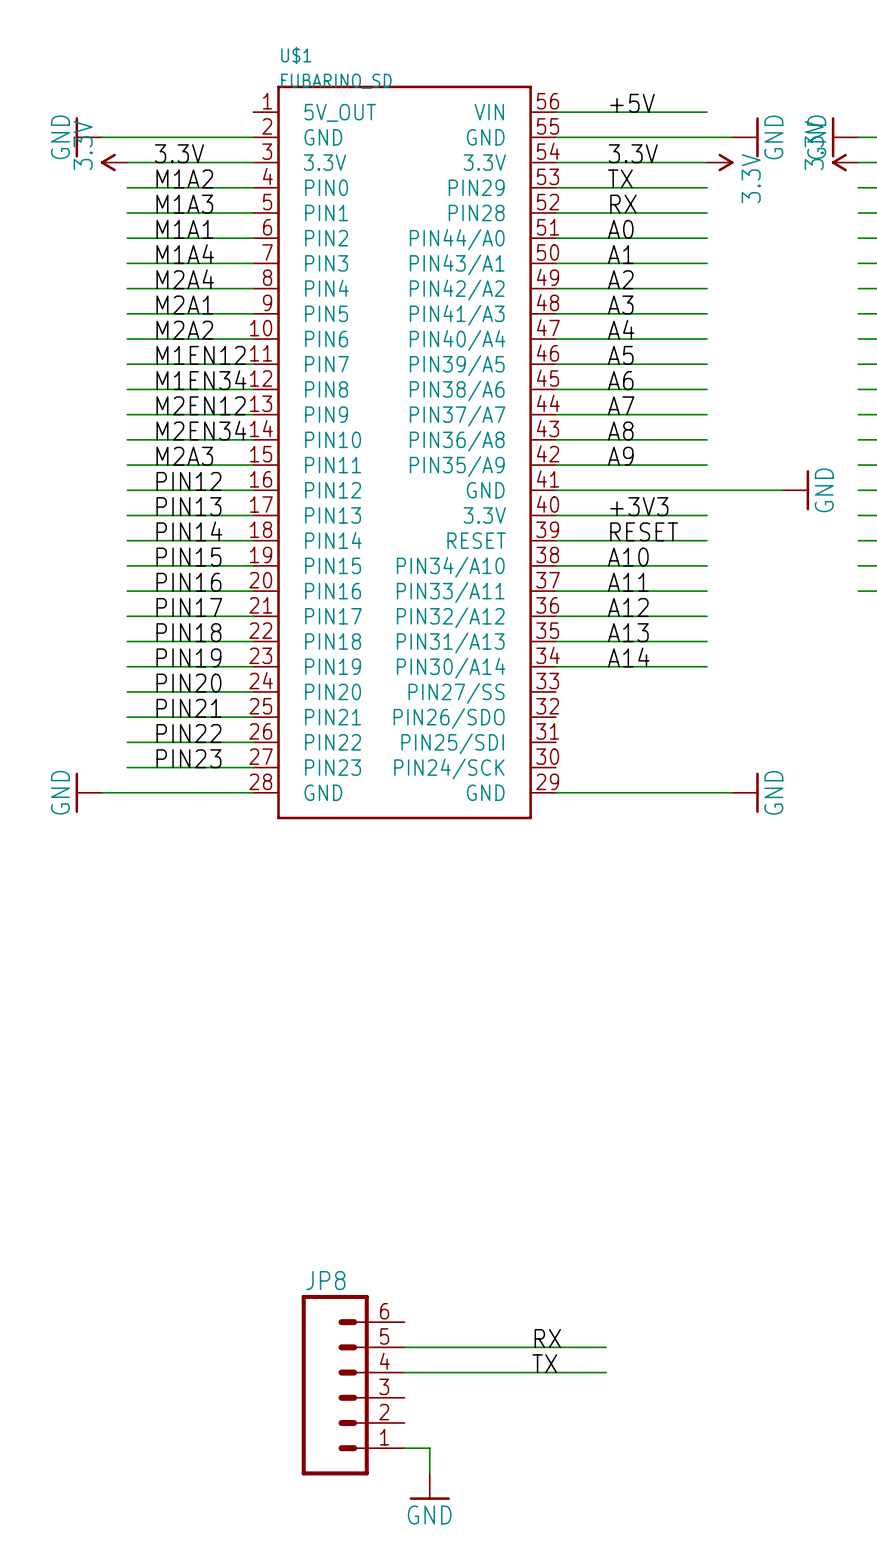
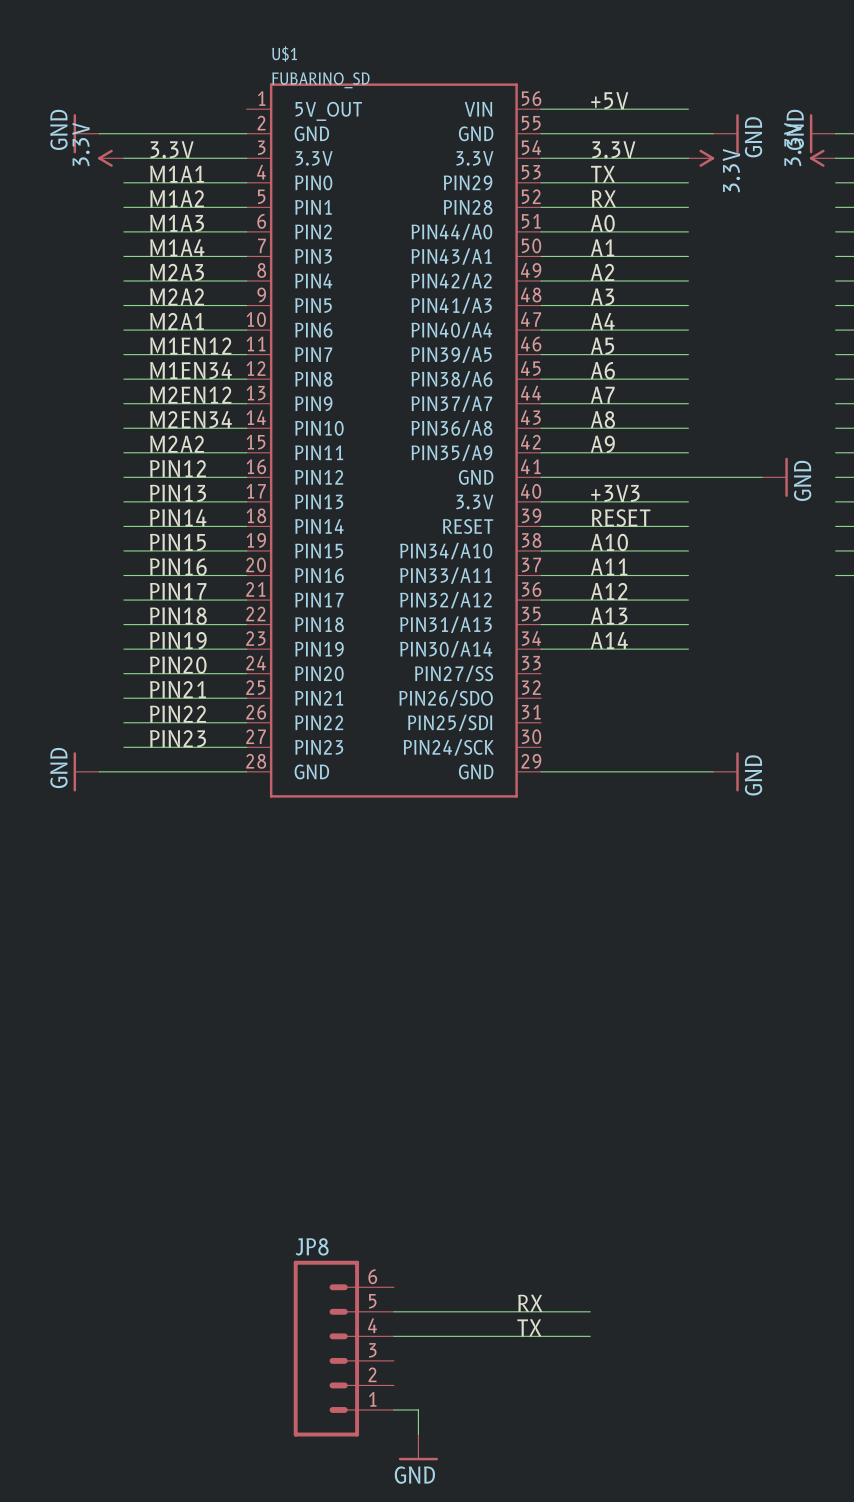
label: M1A2 (184, 178) -> M1A1 (177, 174)
label: M1A3 (184, 204) -> M1A2 (177, 198)
label: M1A1 (184, 229) -> M1A3 (177, 223)
label: M2A4 (185, 279) -> M2A3 (177, 272)
label: M2A1 (184, 304) -> M2A2 (177, 296)
label: M2A2 (184, 330) -> M2A1 (177, 321)
label: M2A3 (184, 456) -> M2A2 (177, 444)

